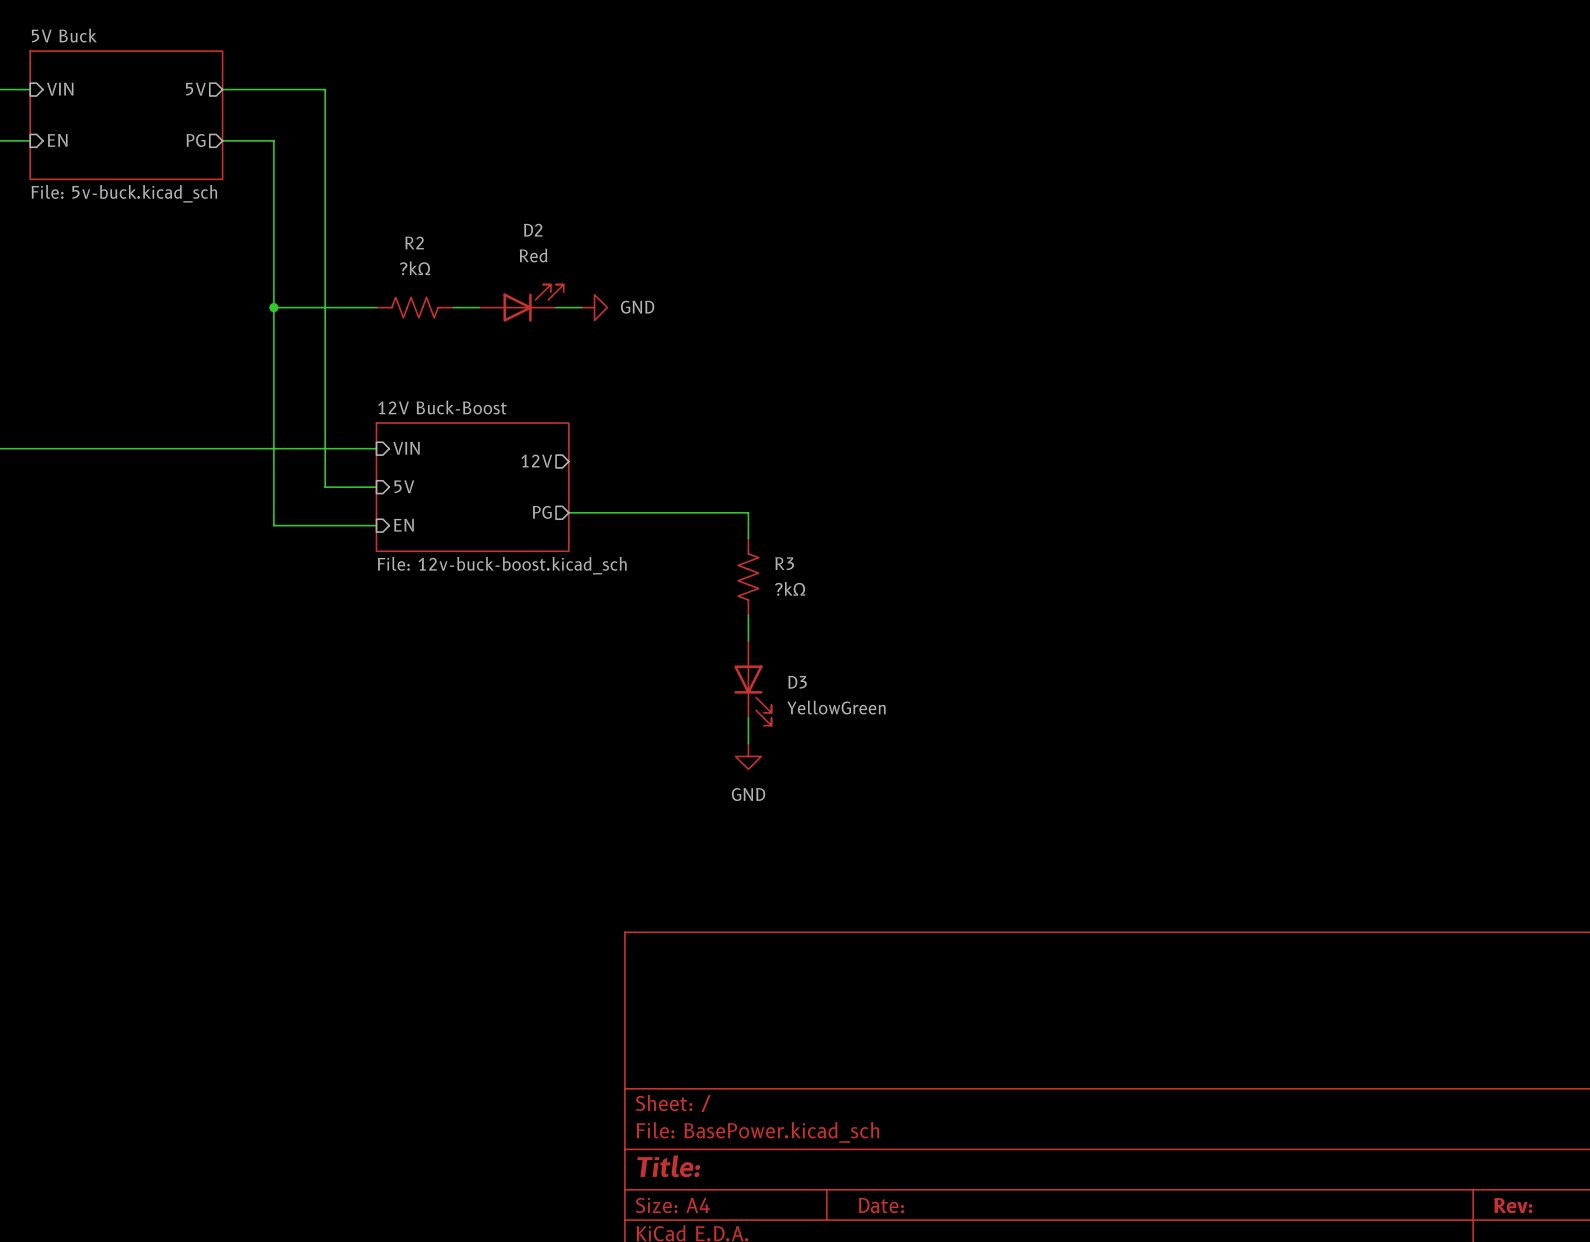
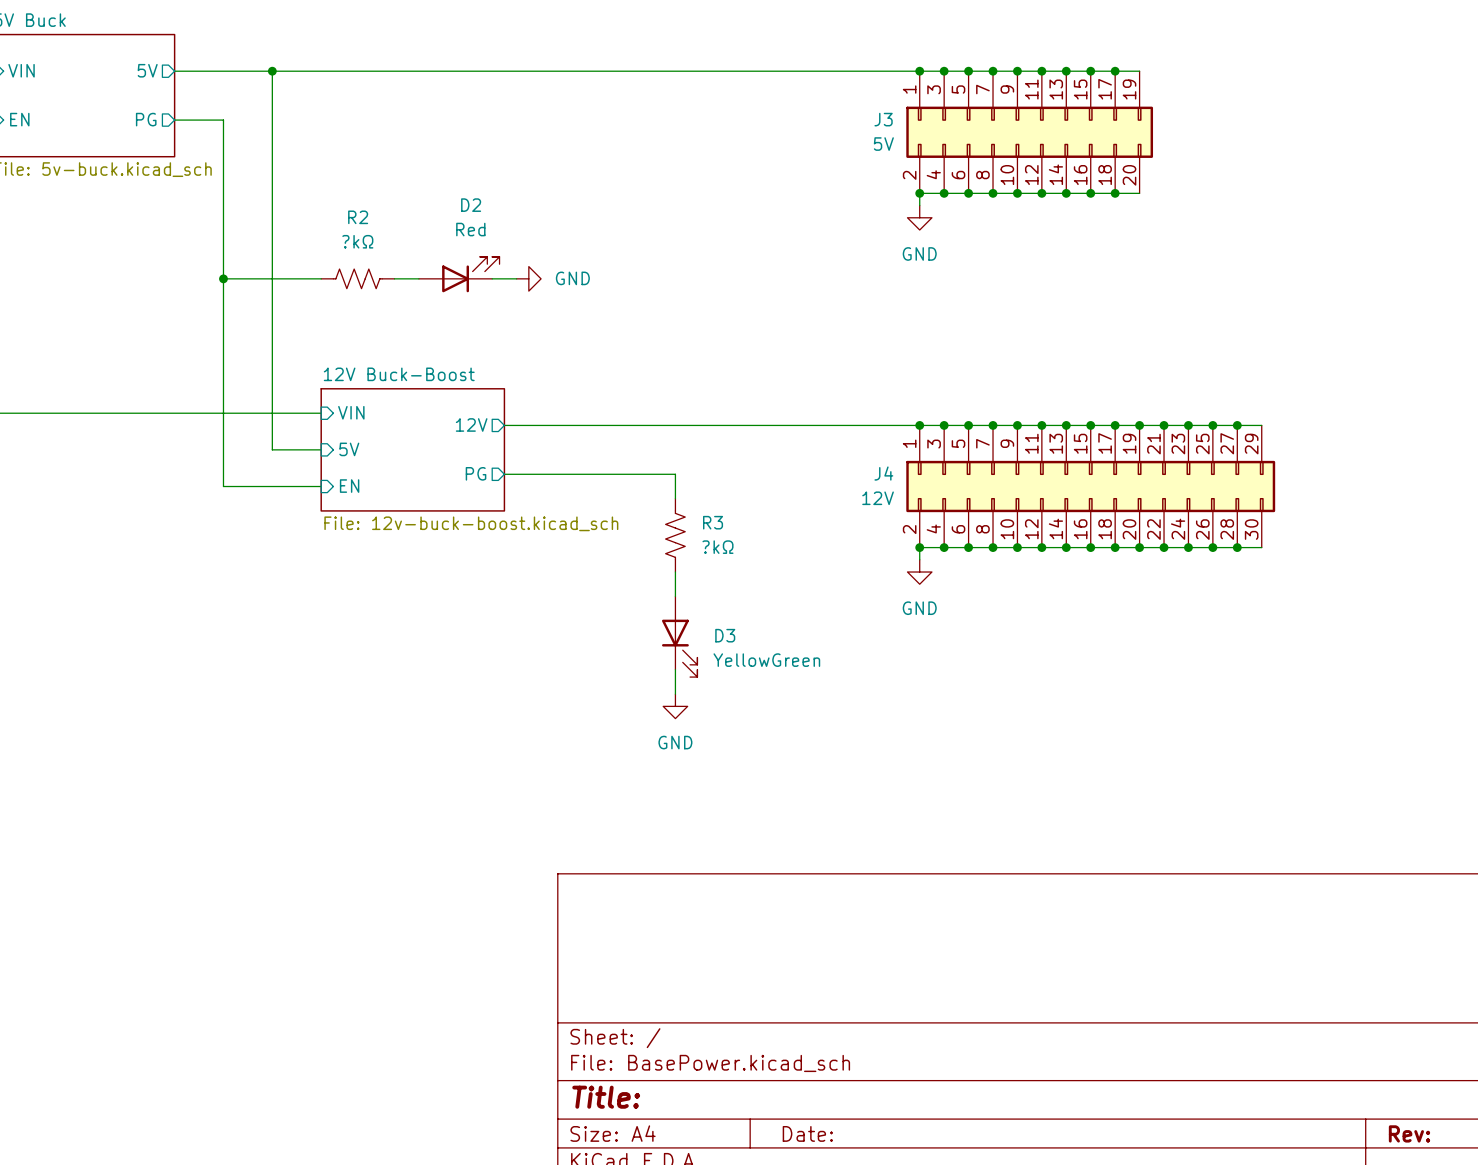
wire: none -> (272, 71) (1139, 71)
junction: none -> (272, 71)
junction: none -> (919, 71)
junction: none -> (944, 71)
junction: none -> (968, 71)
junction: none -> (993, 71)
junction: none -> (1017, 71)
junction: none -> (1041, 71)
junction: none -> (1066, 71)
junction: none -> (1090, 71)
junction: none -> (1115, 71)
J3: none -> 5V (1029, 132)
junction: none -> (919, 193)
junction: none -> (944, 193)
junction: none -> (968, 193)
junction: none -> (993, 193)
junction: none -> (1017, 193)
junction: none -> (1041, 193)
junction: none -> (1066, 193)
junction: none -> (1090, 193)
junction: none -> (1115, 193)
wire: none -> (1139, 193) (919, 193) (919, 205)
power symbol: none -> GND (919, 217)
wire: none -> (504, 425) (1261, 425)
junction: none -> (919, 425)
junction: none -> (944, 425)
junction: none -> (968, 425)
junction: none -> (993, 425)
junction: none -> (1017, 425)
junction: none -> (1041, 425)
junction: none -> (1066, 425)
junction: none -> (1090, 425)
junction: none -> (1115, 425)
junction: none -> (1139, 425)
junction: none -> (1164, 425)
junction: none -> (1188, 425)
junction: none -> (1212, 425)
junction: none -> (1237, 425)
J4: none -> 12V (1090, 486)
junction: none -> (919, 547)
junction: none -> (944, 547)
junction: none -> (968, 547)
junction: none -> (993, 547)
junction: none -> (1017, 547)
junction: none -> (1041, 547)
junction: none -> (1066, 547)
junction: none -> (1090, 547)
junction: none -> (1115, 547)
junction: none -> (1139, 547)
junction: none -> (1164, 547)
junction: none -> (1188, 547)
junction: none -> (1212, 547)
junction: none -> (1237, 547)
wire: none -> (1261, 547) (919, 547) (919, 559)
power symbol: none -> GND (919, 572)

